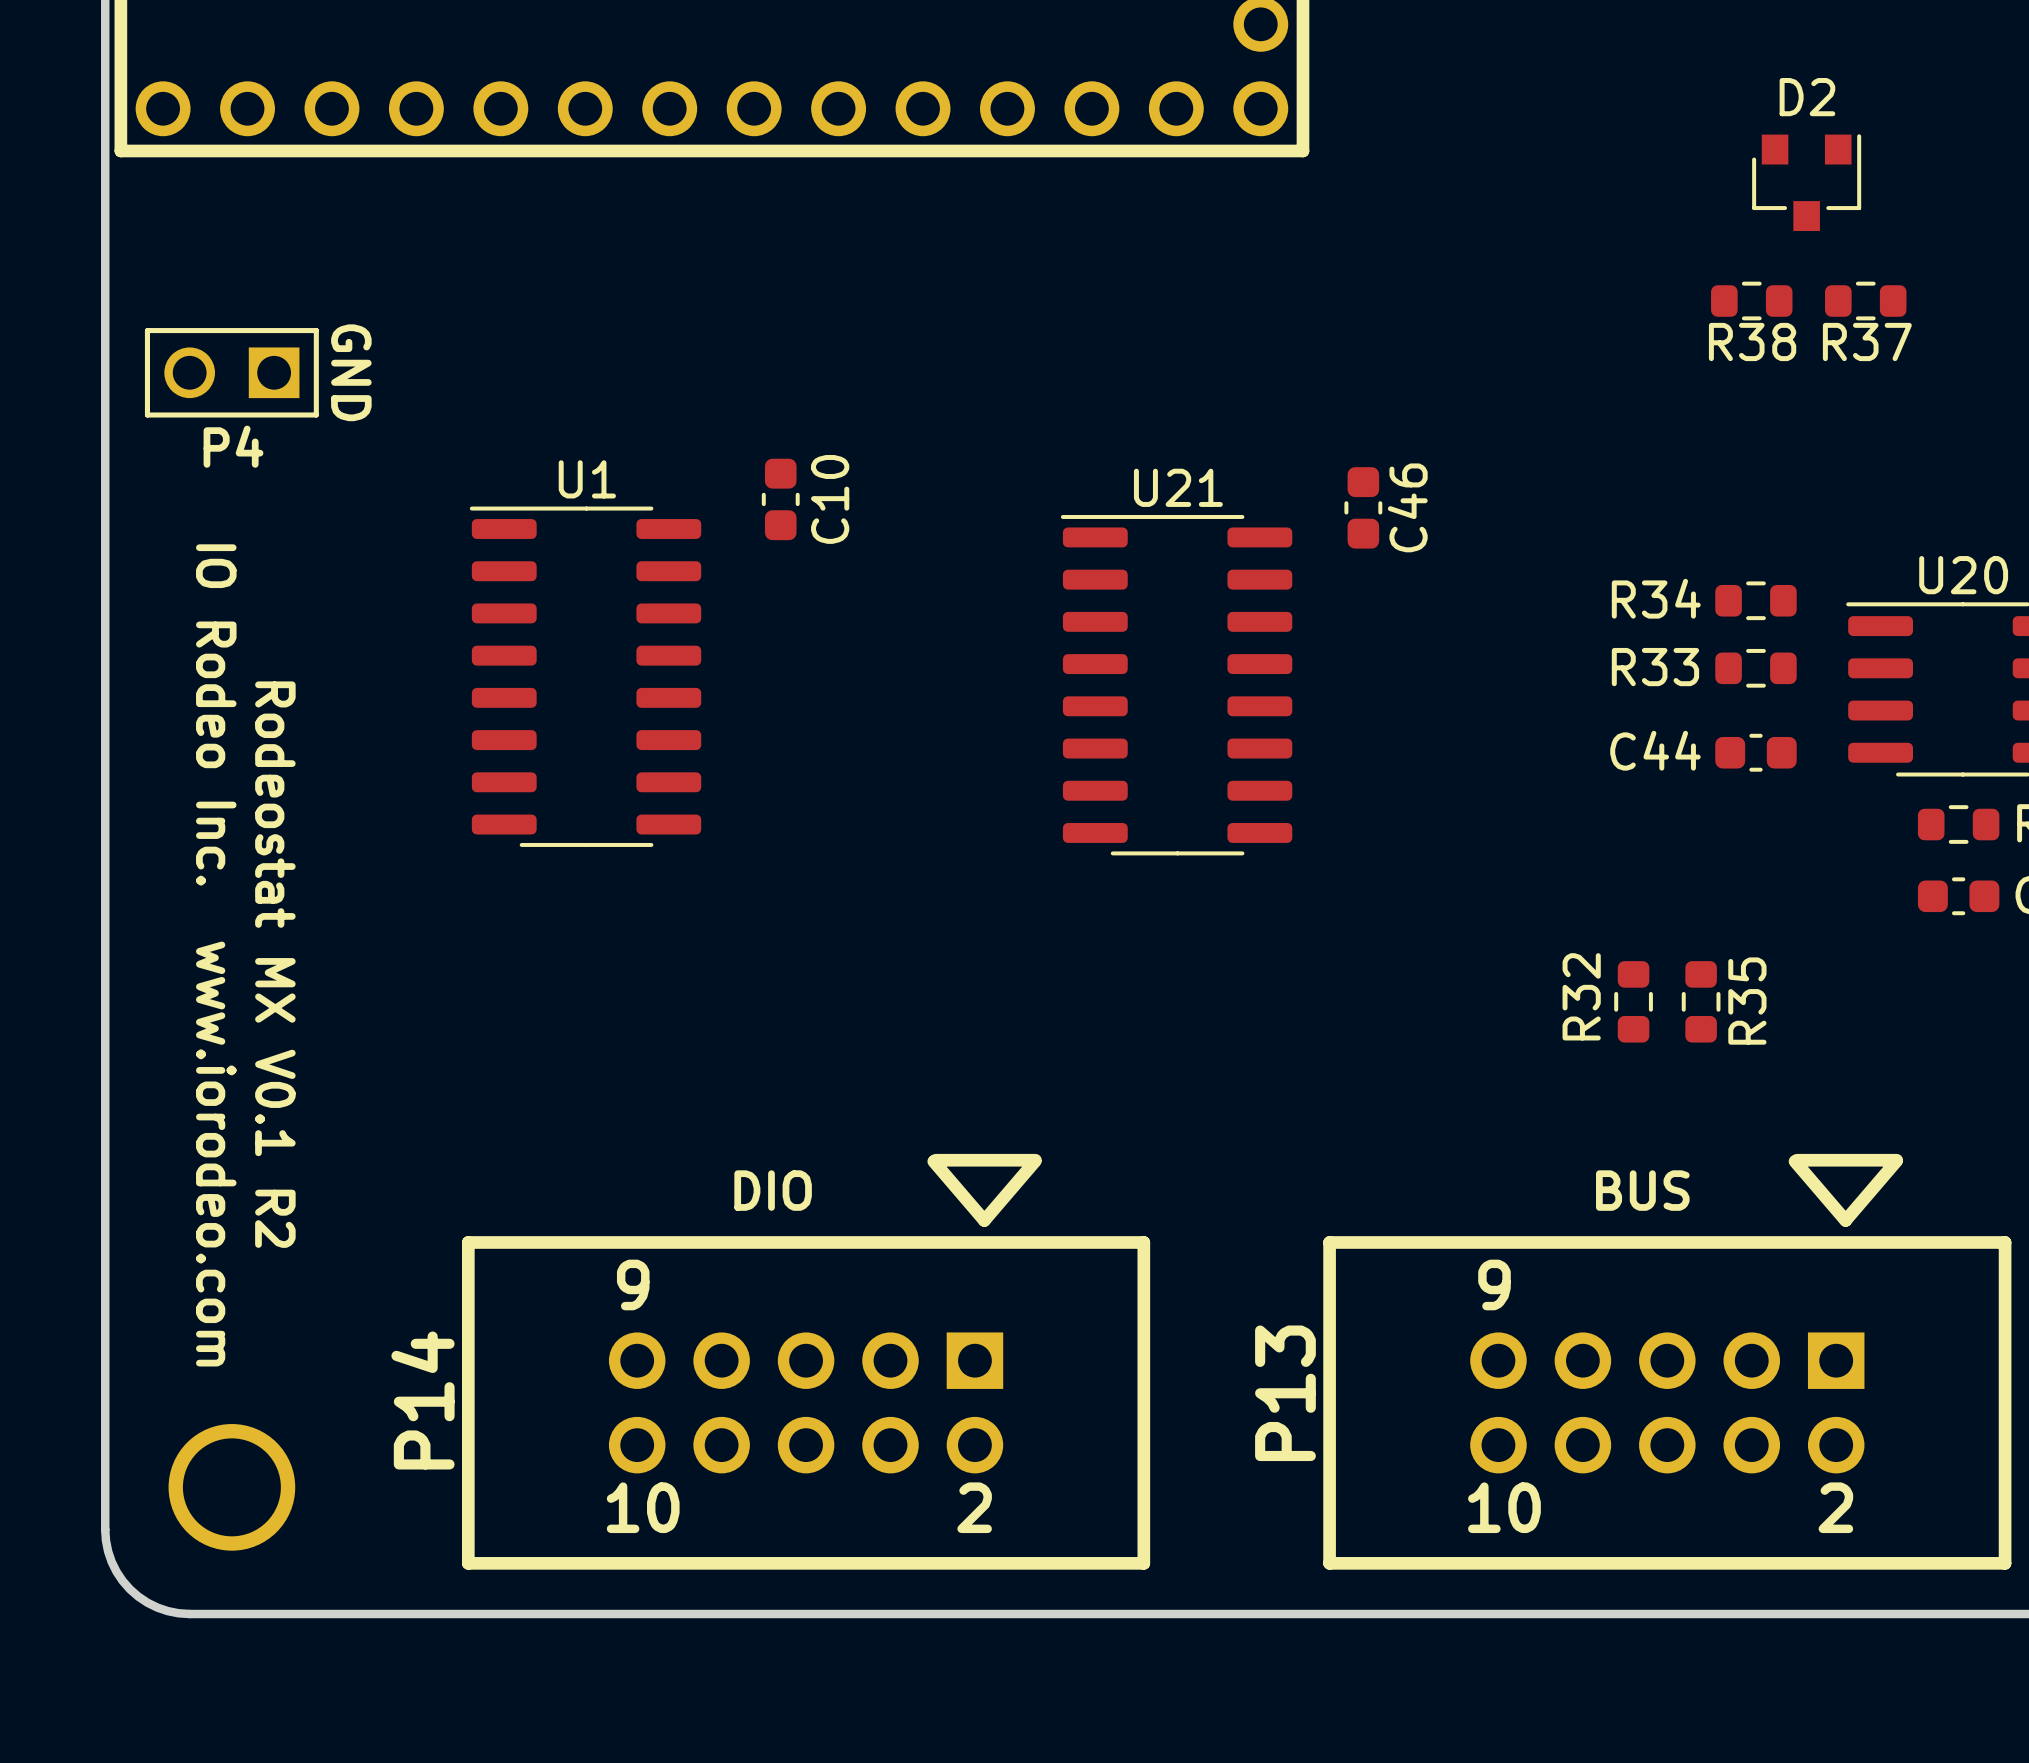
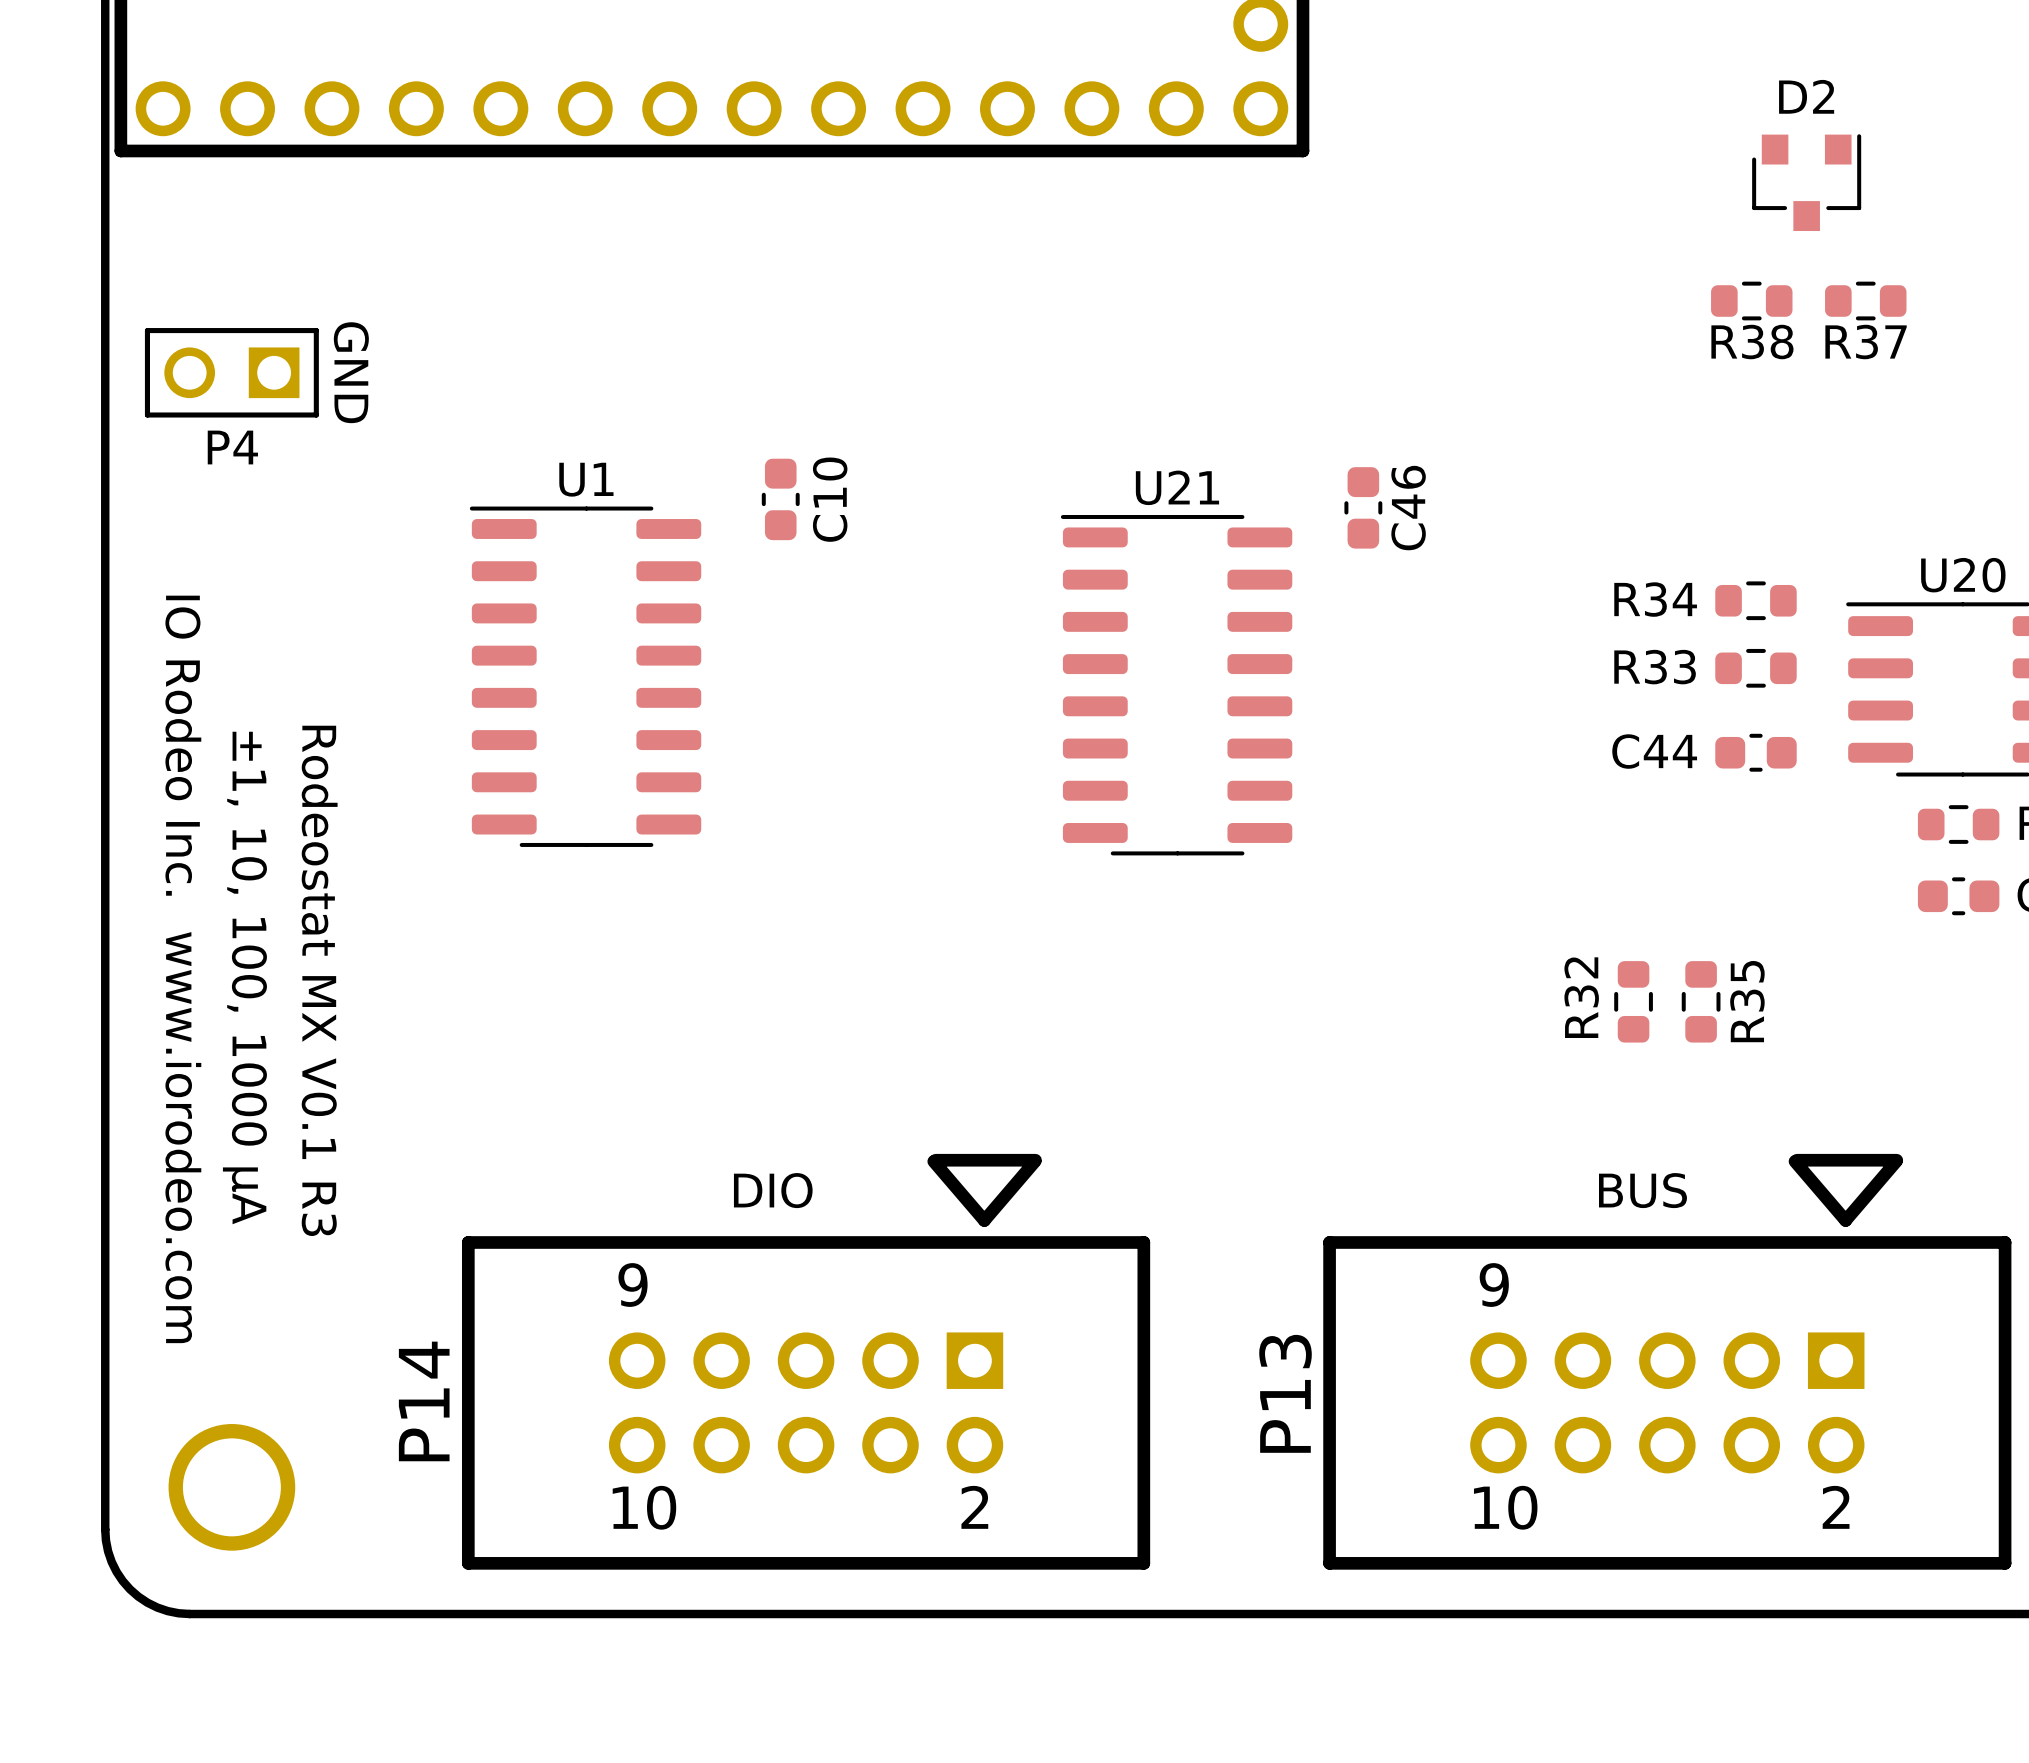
text position: IO Rodeo Inc. www.iorodeo.com (216, 955) -> IO Rodeo Inc. www.iorodeo.com (183, 969)
text: Rodeostat MX V0.1 R2 (275, 964) -> Rodeostat MX V0.1 R3 (319, 980)
text: none -> ±1, 10, 100, 1000 μA (244, 978)

